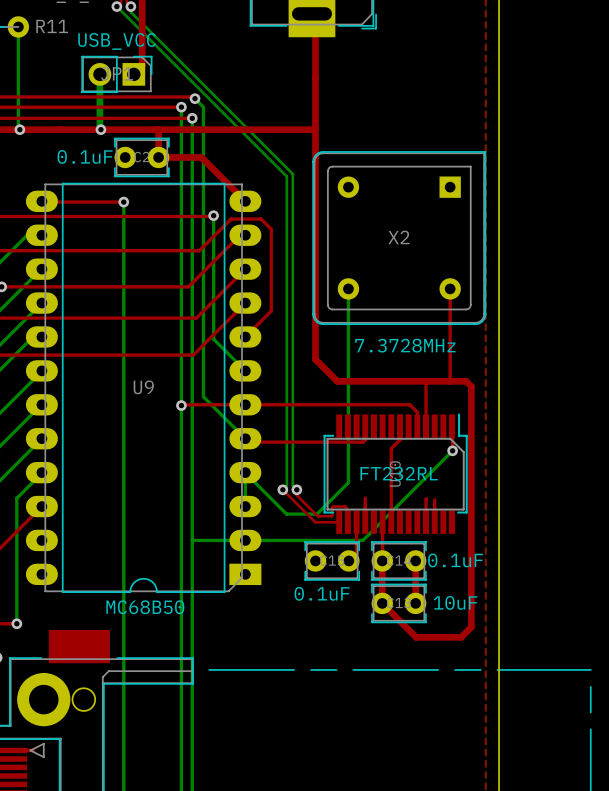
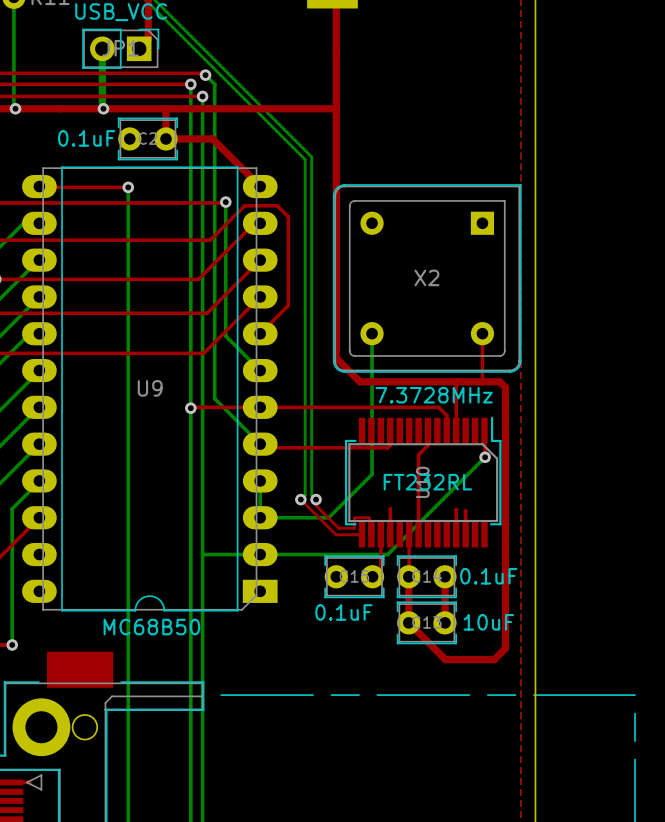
X2 position: (399, 238) -> (427, 278)
bottom track: (348, 288) (348, 336) -> none
top track: (450, 288) (450, 336) -> none
bottom track: (348, 466) (348, 482) (317, 514) (286, 514) (245, 472) -> (372, 474) (328, 517) (260, 517)

